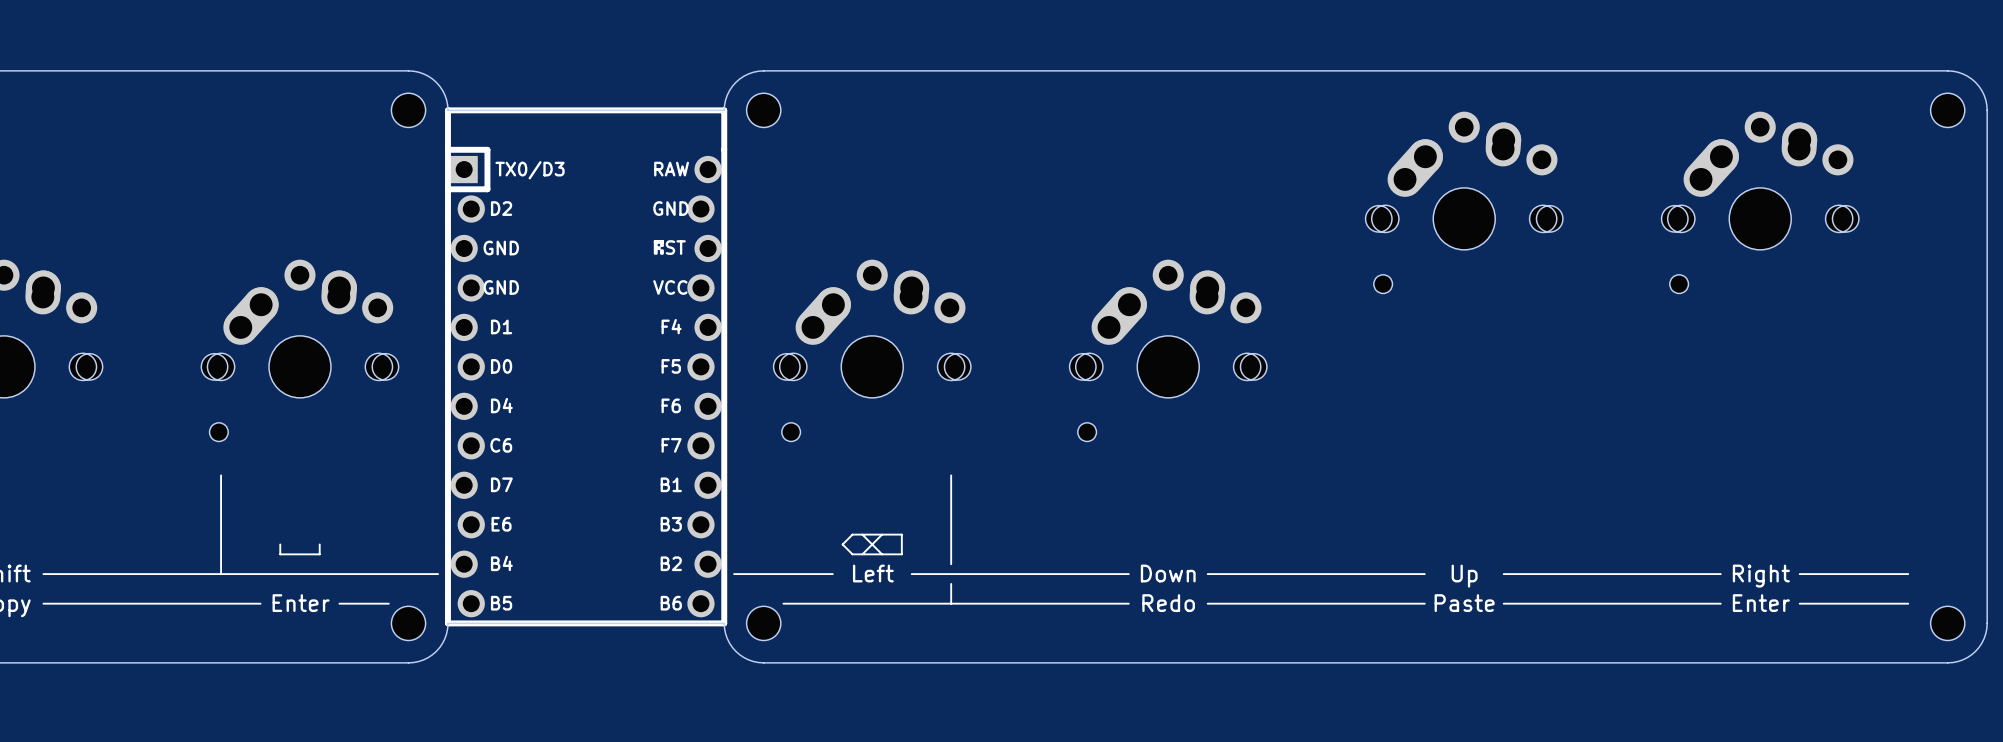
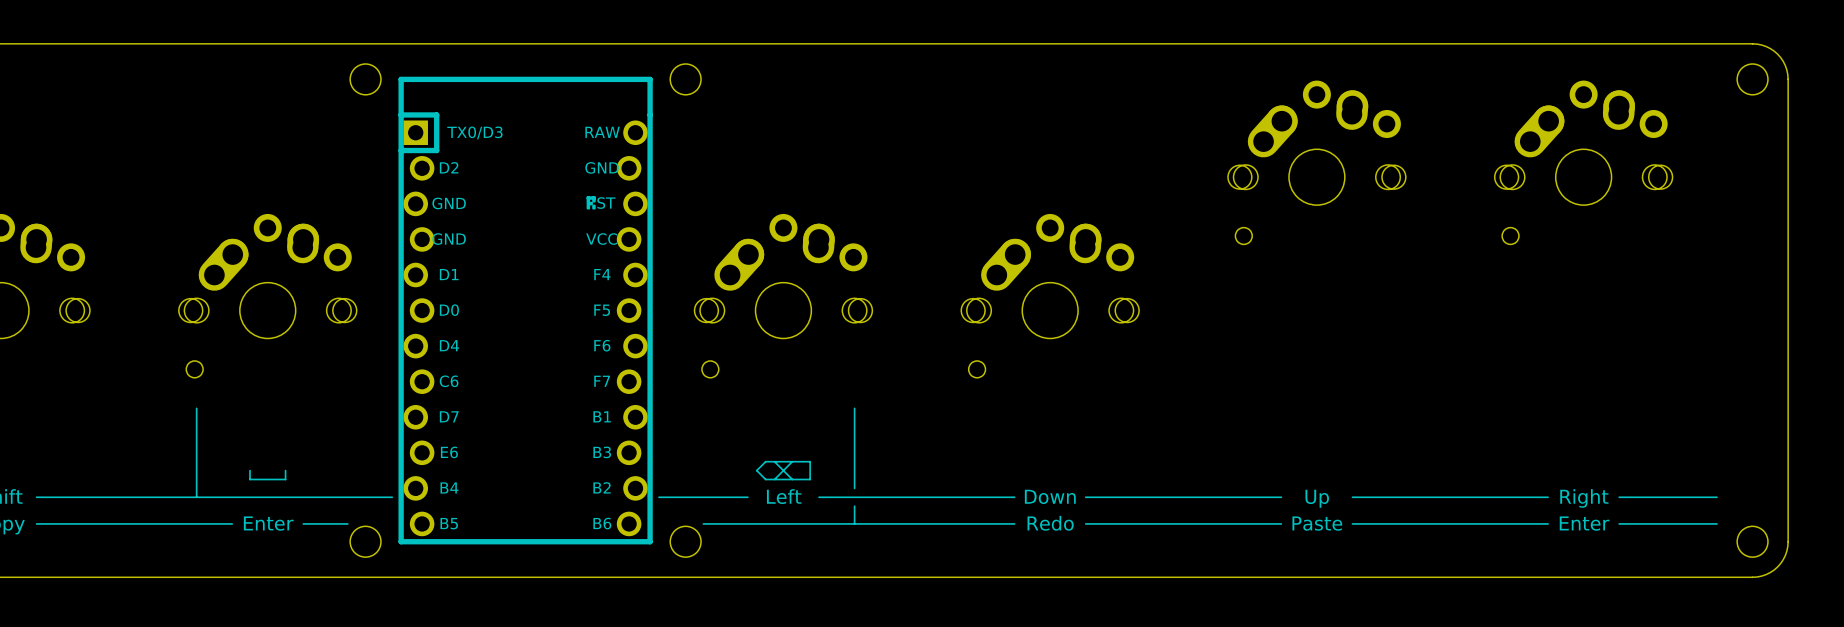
board edge: (408, 70) (423, 73) (436, 82) (444, 95) (447, 110) (724, 110) -> (365, 43) (685, 43)
board edge: (763, 70) (748, 73) (735, 82) (727, 95) (724, 110) -> none
board edge: (408, 662) (423, 659) (436, 651) (444, 638) (447, 623) (724, 623) (727, 638) (735, 651) (748, 659) (763, 662) -> (365, 577) (685, 577)

